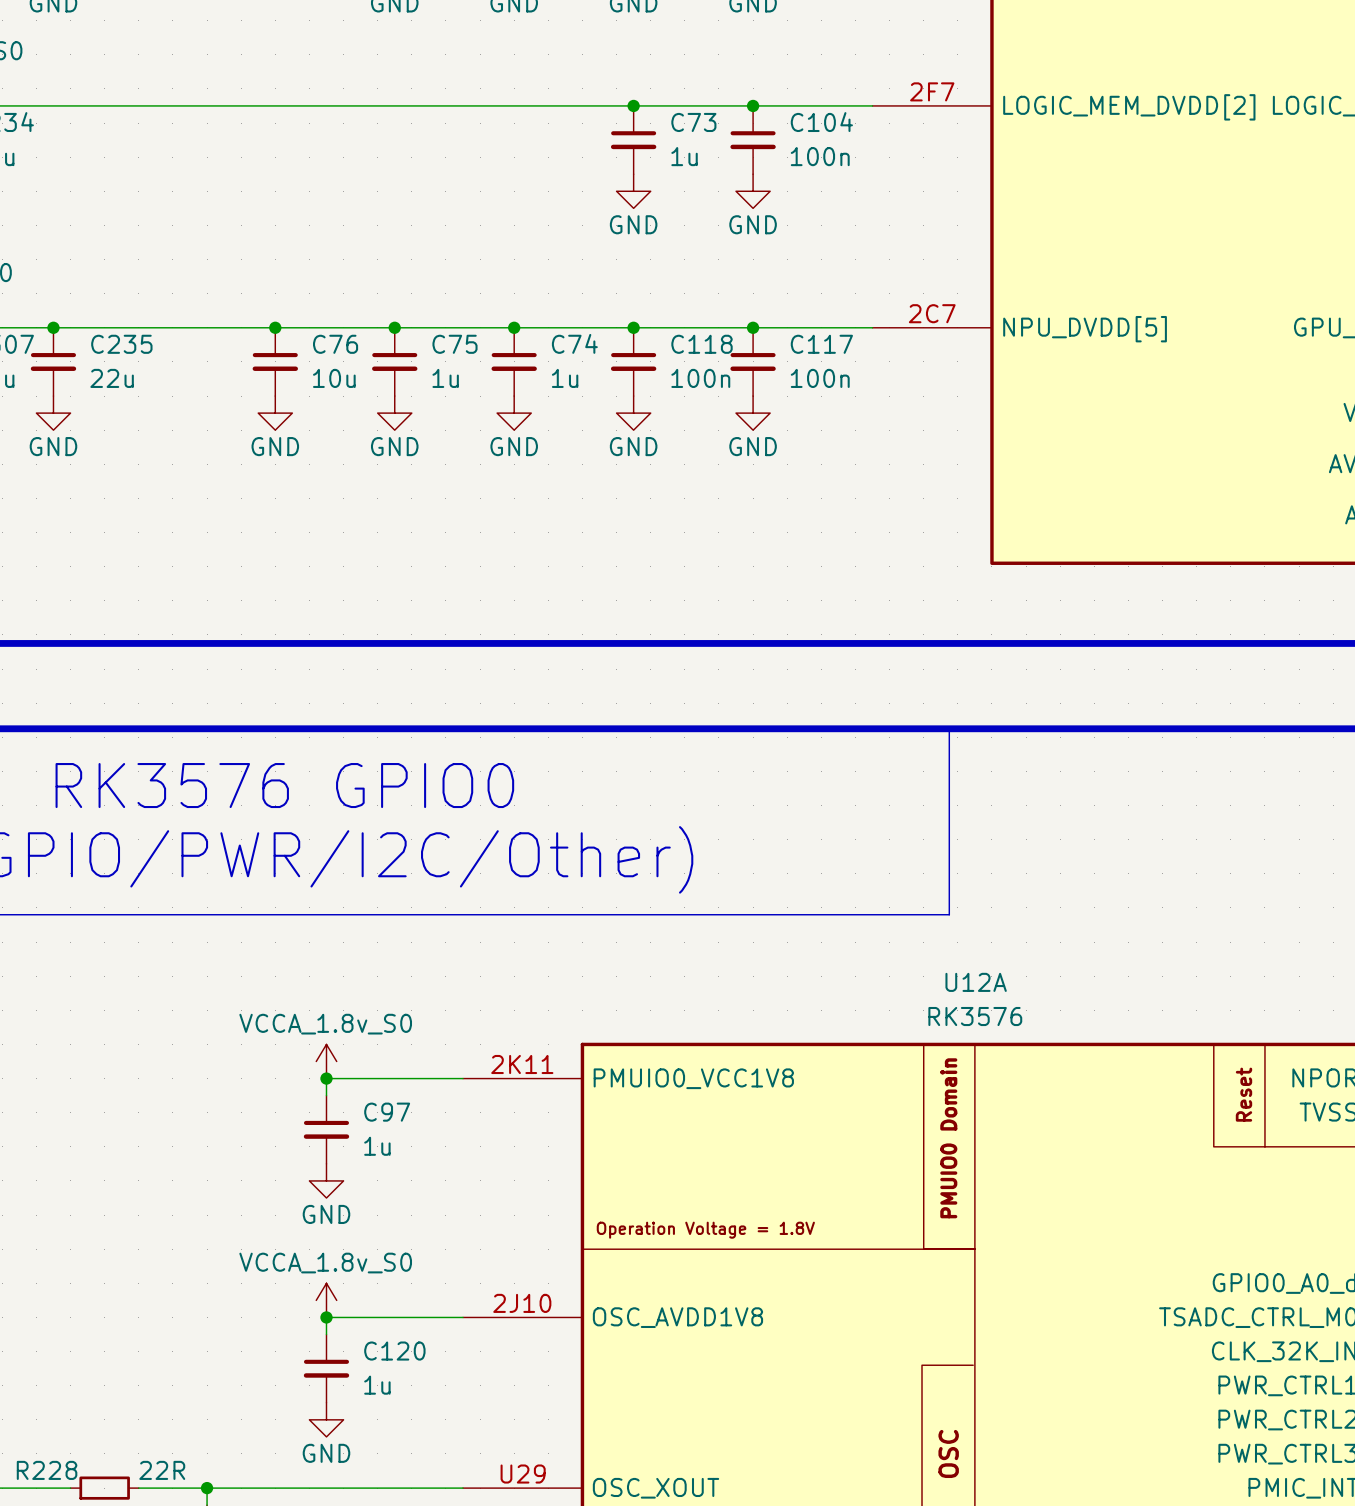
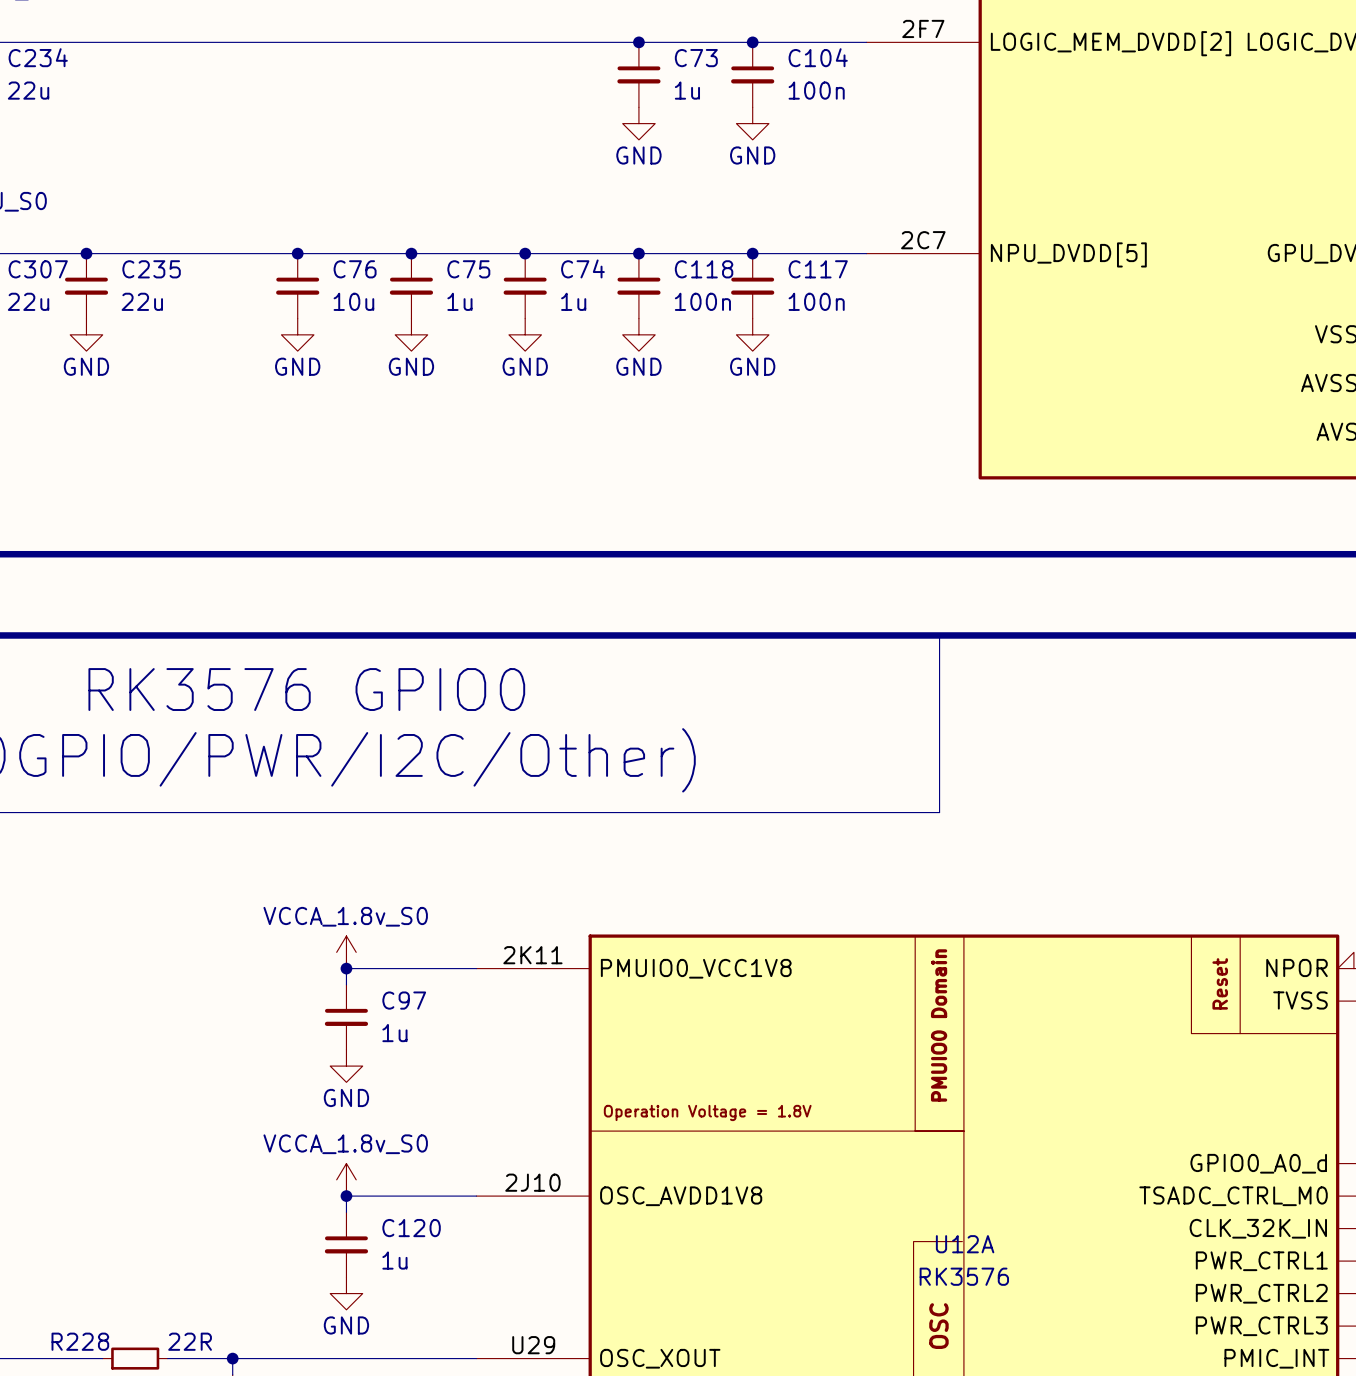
U12A name position: U12A (976, 982) -> U12A (965, 1244)
U12A value position: RK3576 (975, 1016) -> RK3576 (964, 1276)

